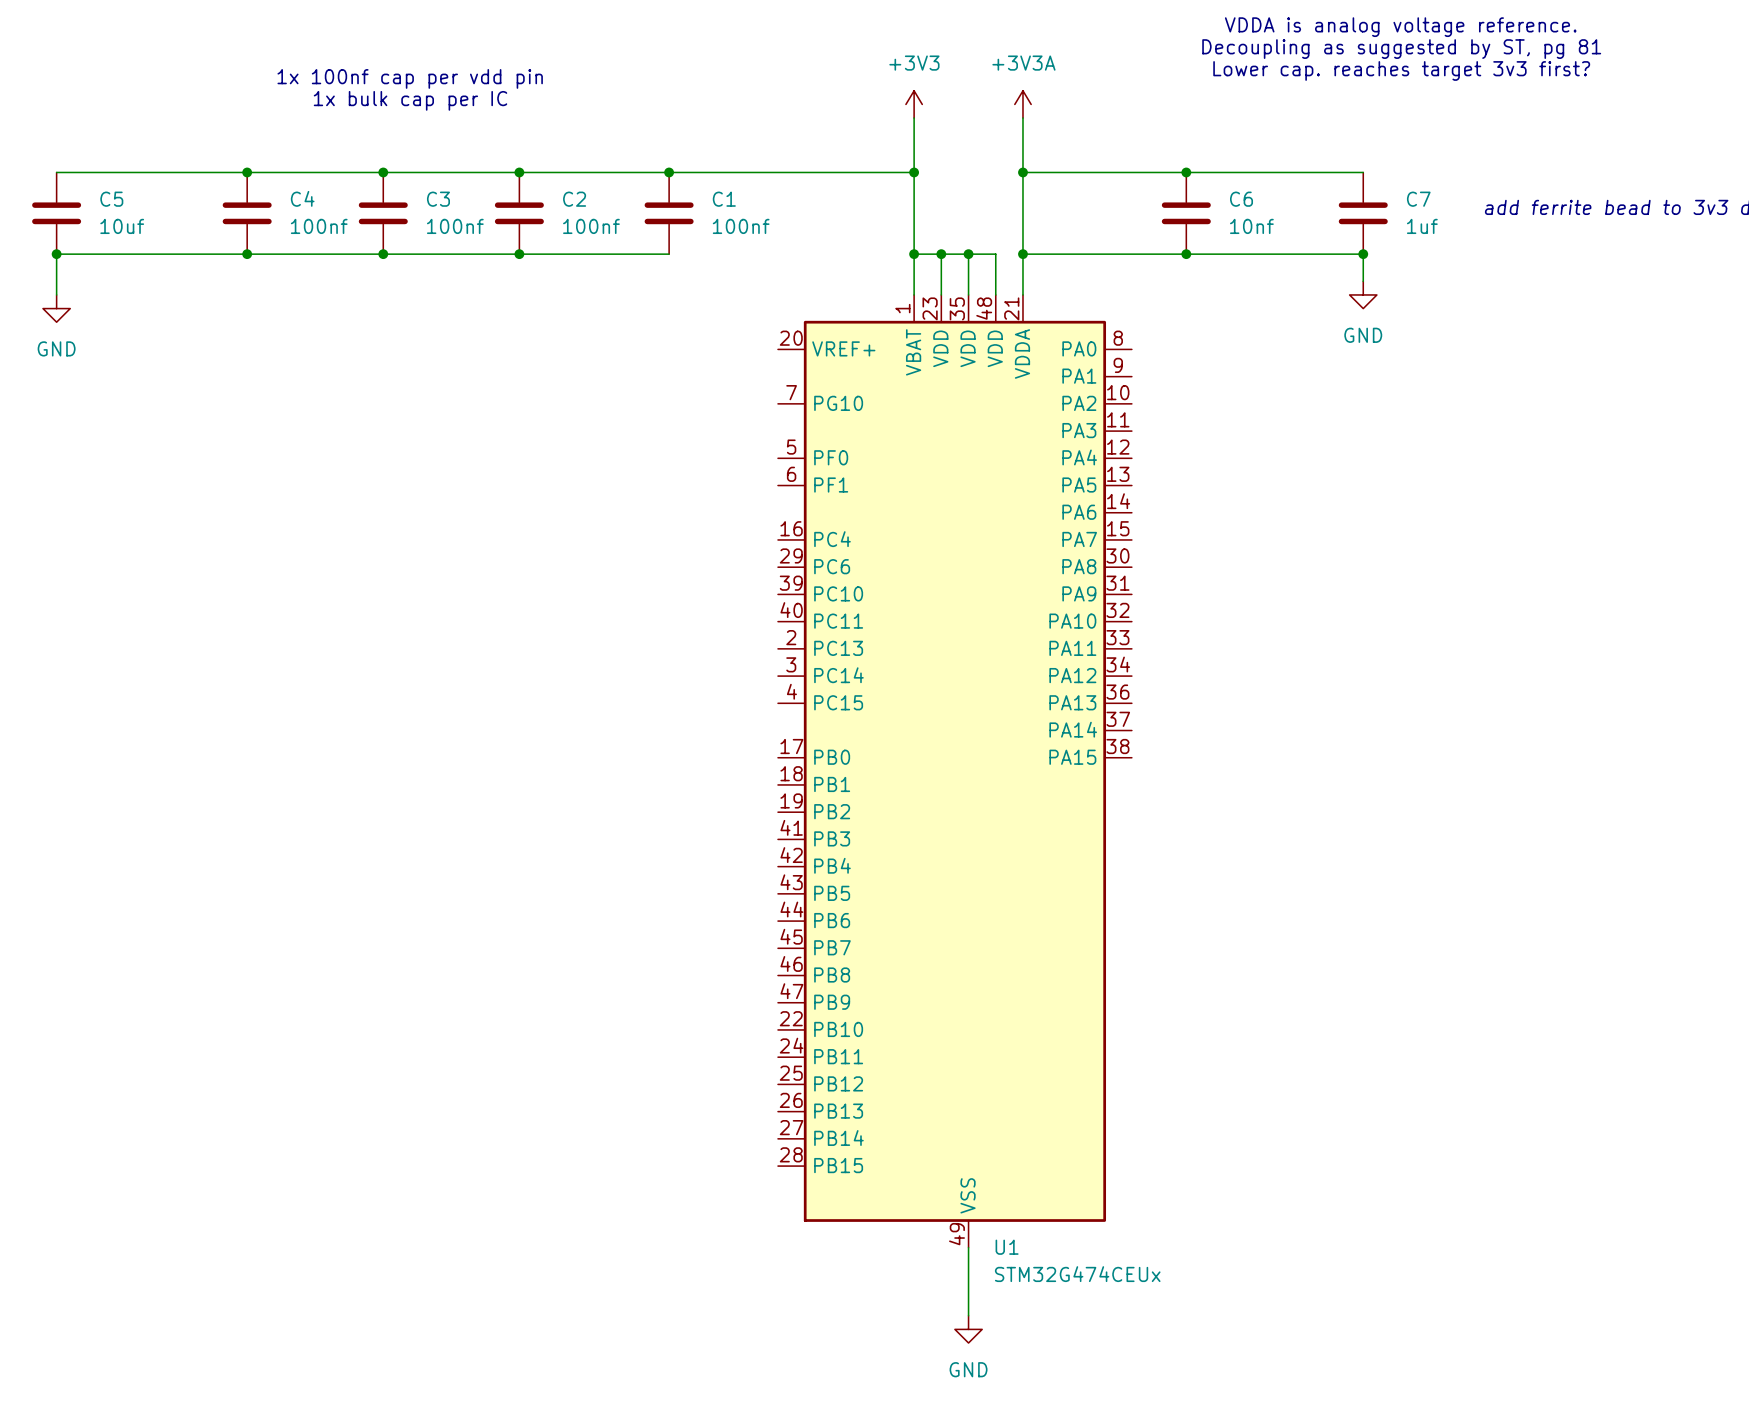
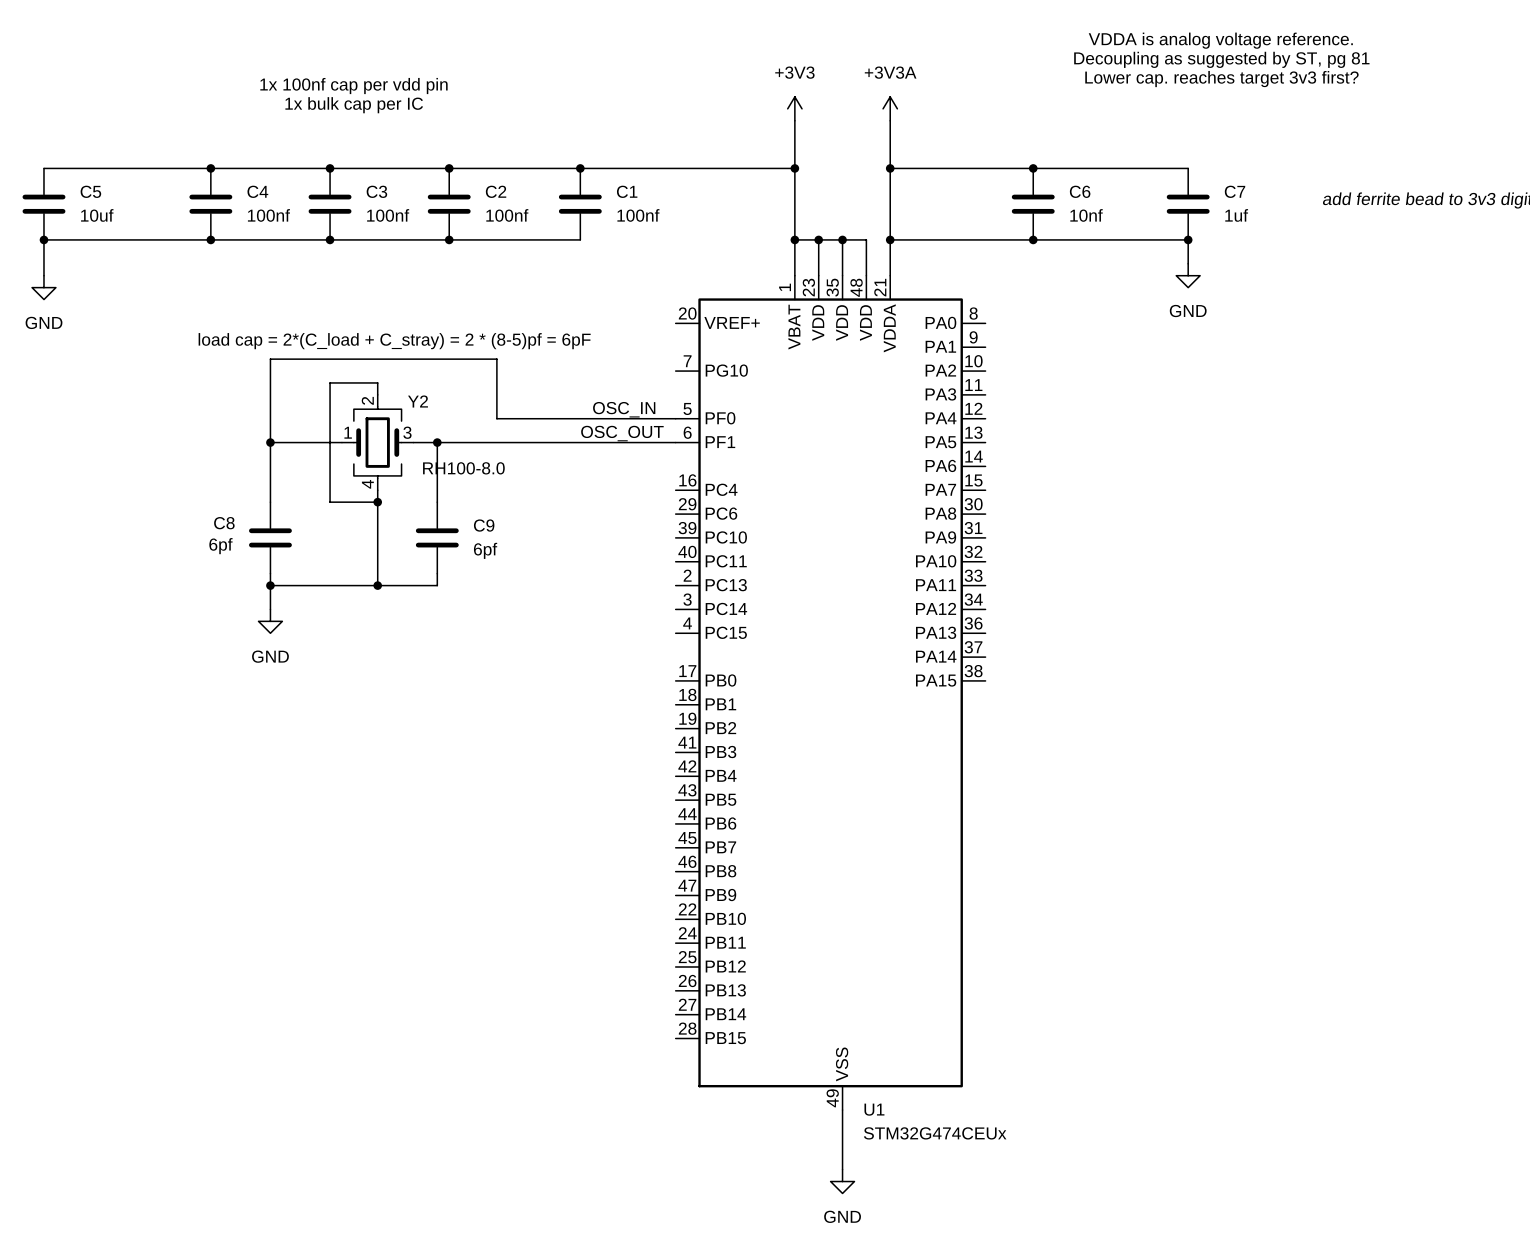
text: none -> load cap = 2*(C_load + C_stray) = 2 * (8-5)pf = 6pF (394, 341)
wire: none -> (377, 394) (377, 382) (330, 382) (330, 502) (377, 502)
label: none -> OSC_IN (624, 409)
wire: none -> (675, 418) (496, 418) (496, 359) (270, 359) (270, 502)
label: none -> OSC_OUT (622, 433)
wire: none -> (270, 442) (341, 442)
junction: none -> (270, 442)
Y2: none -> RH100-8.0 (377, 442)
wire: none -> (413, 442) (675, 442)
wire: none -> (437, 442) (437, 502)
junction: none -> (437, 442)
wire: none -> (377, 490) (377, 585)
junction: none -> (377, 502)
C8: none -> 6pf (270, 537)
C9: none -> 6pf (437, 537)
wire: none -> (270, 573) (270, 609)
wire: none -> (437, 573) (437, 585) (270, 585)
junction: none -> (270, 585)
junction: none -> (377, 585)
power symbol: none -> GND (270, 621)

